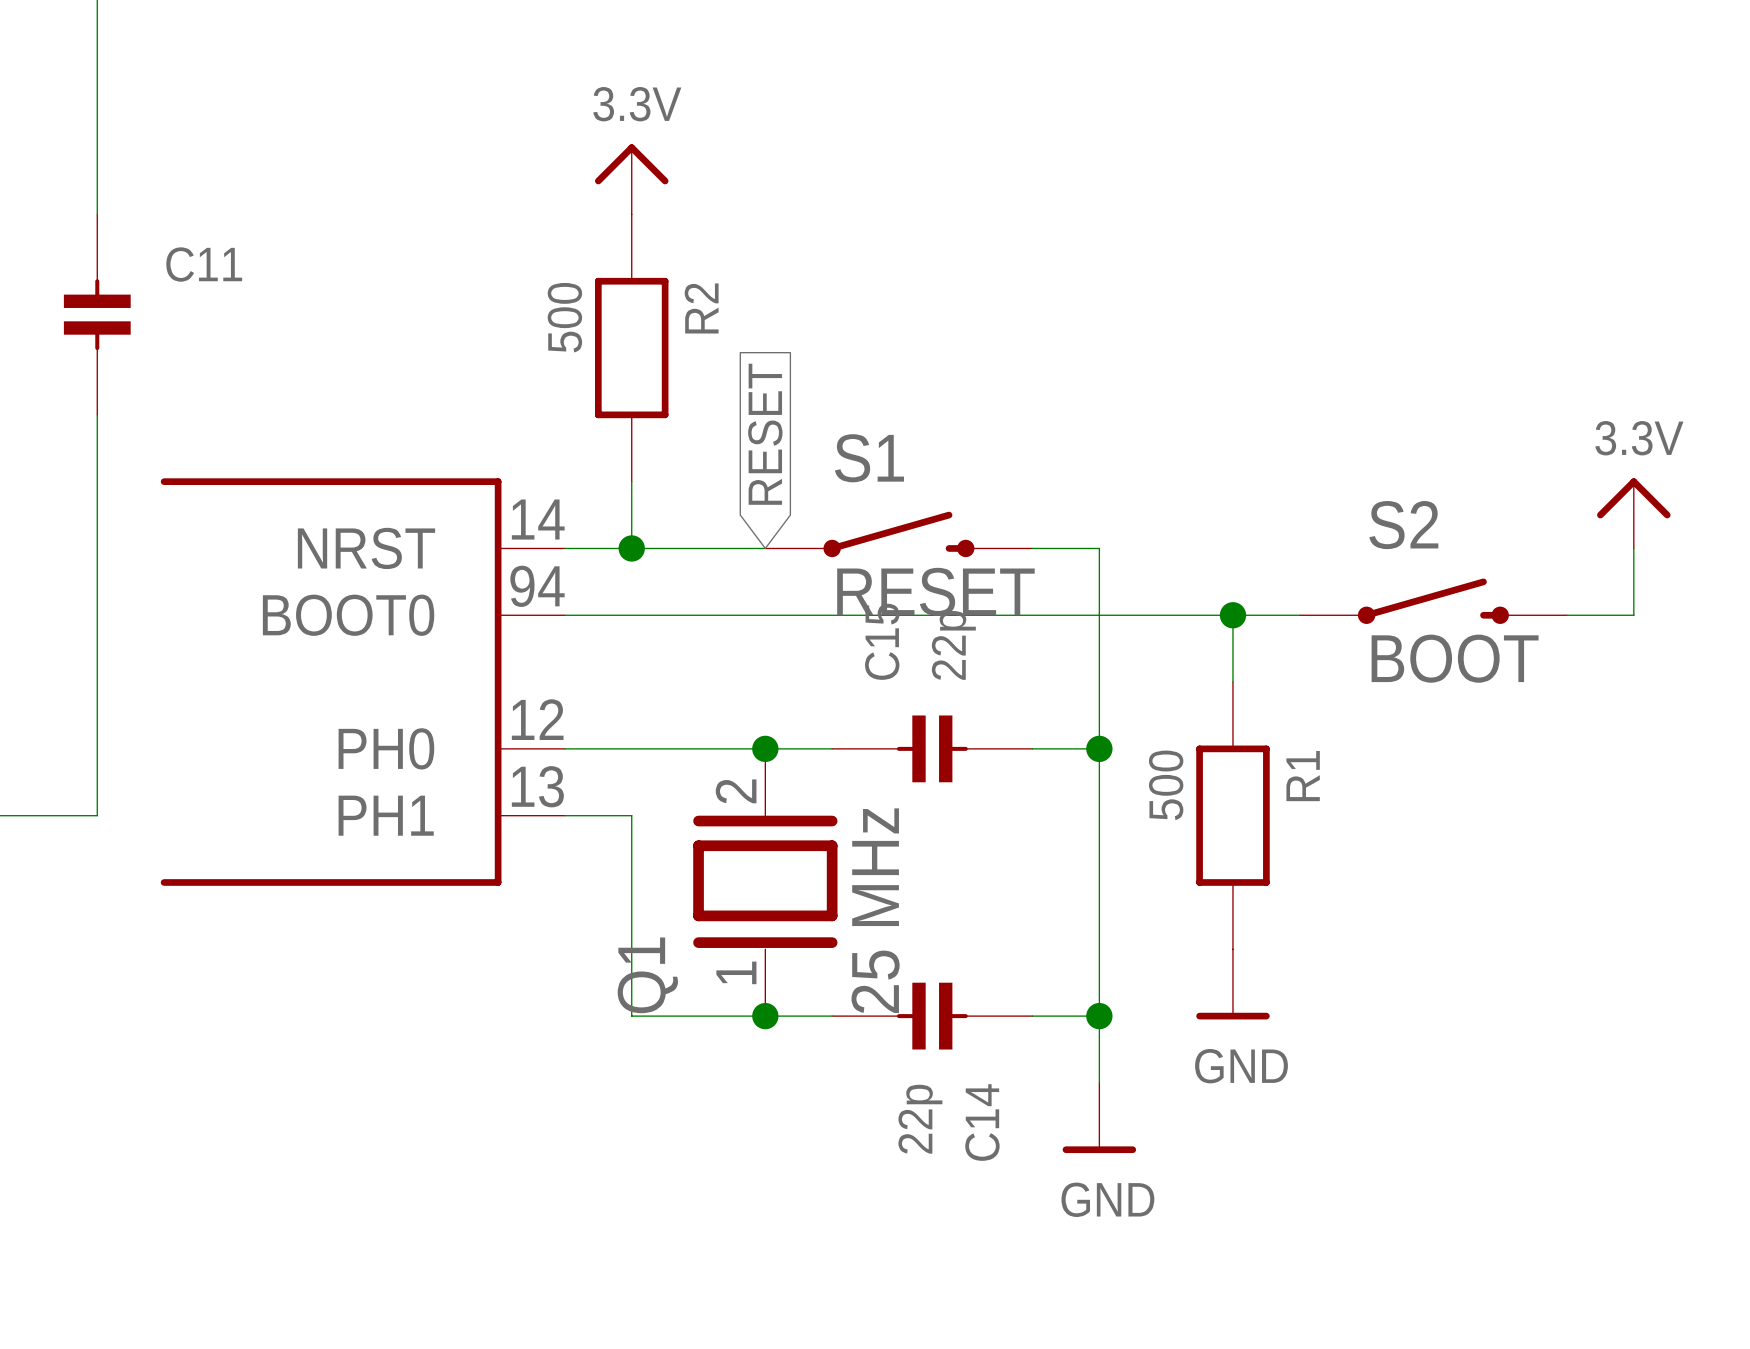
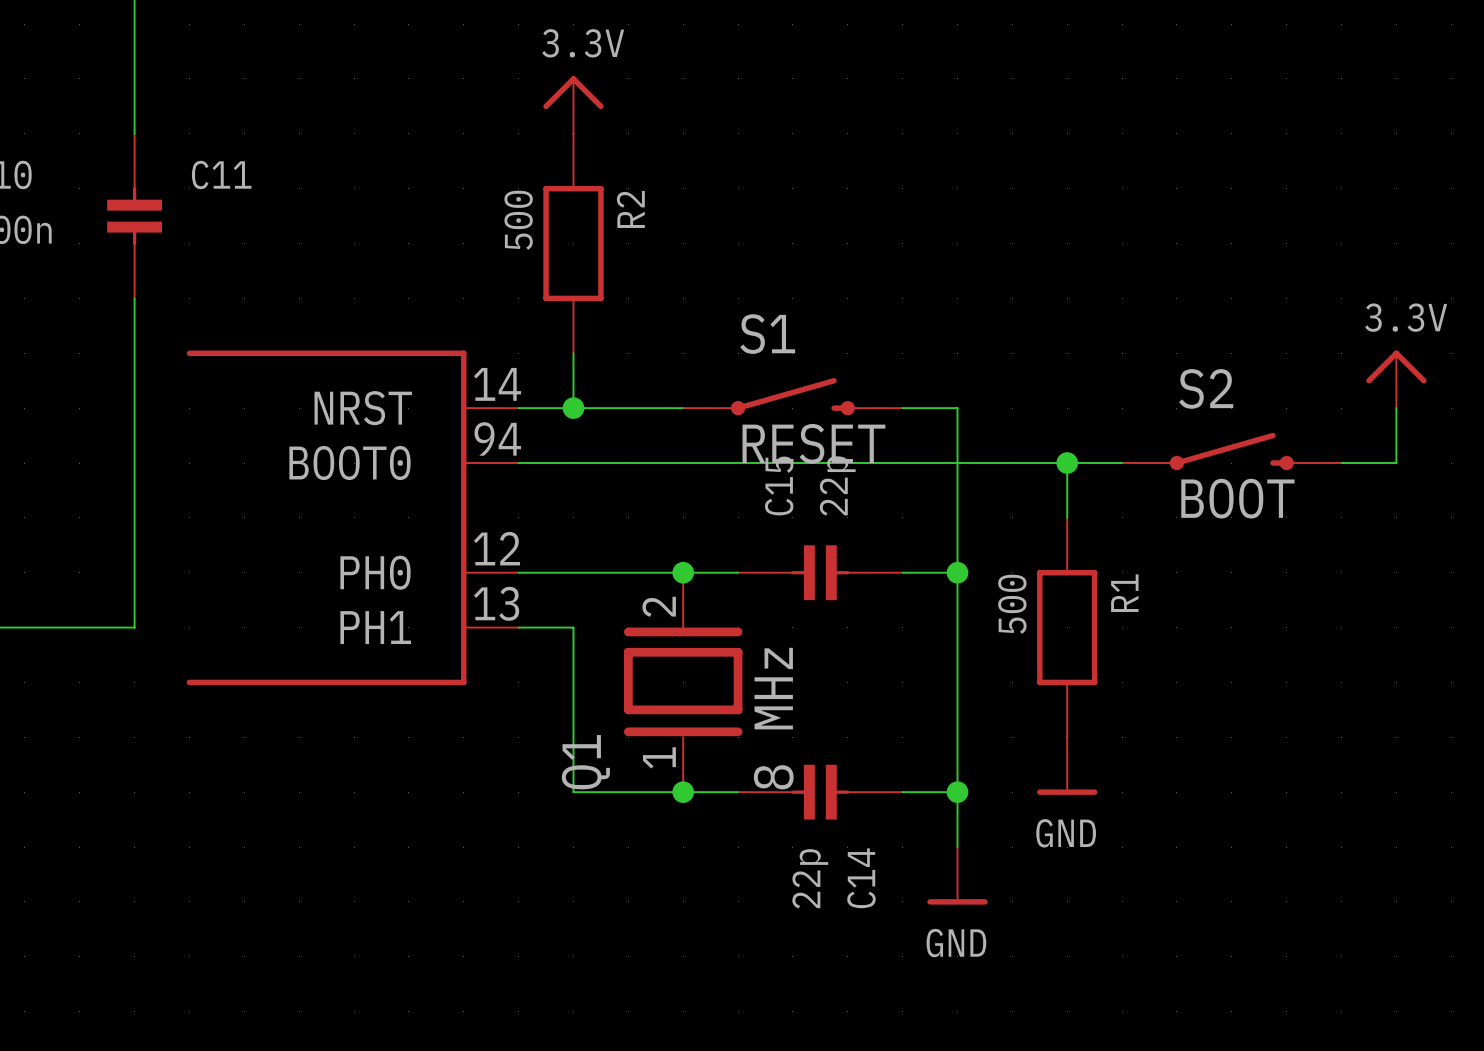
global label: RESET (765, 434) -> none
Q1 value: 25 MHz (875, 910) -> 8 MHz (773, 718)

